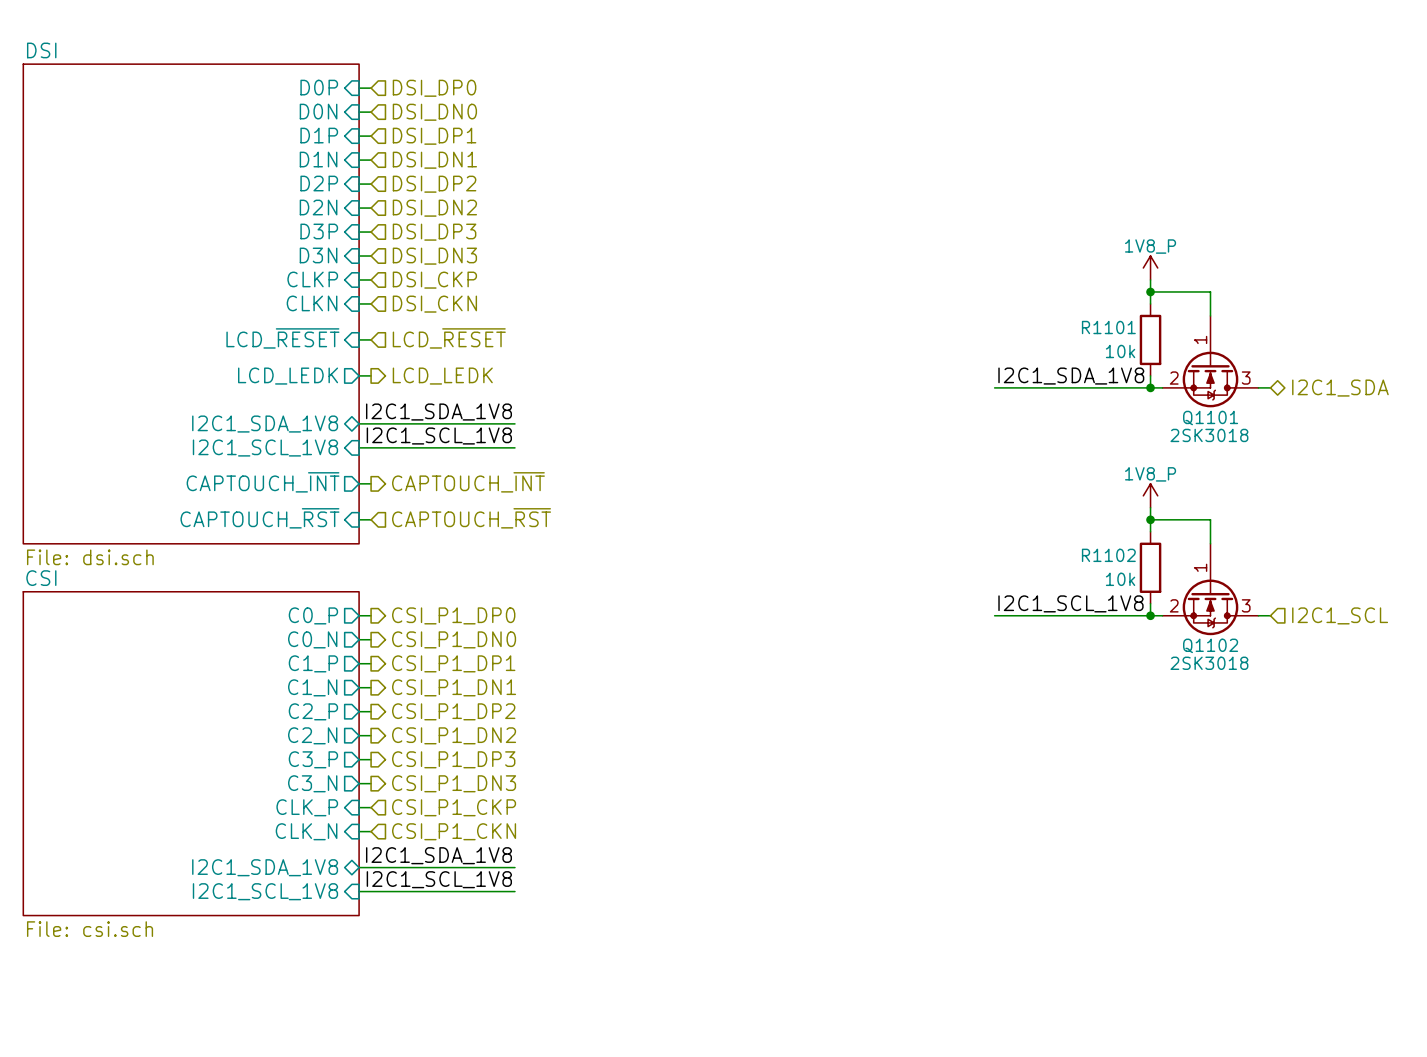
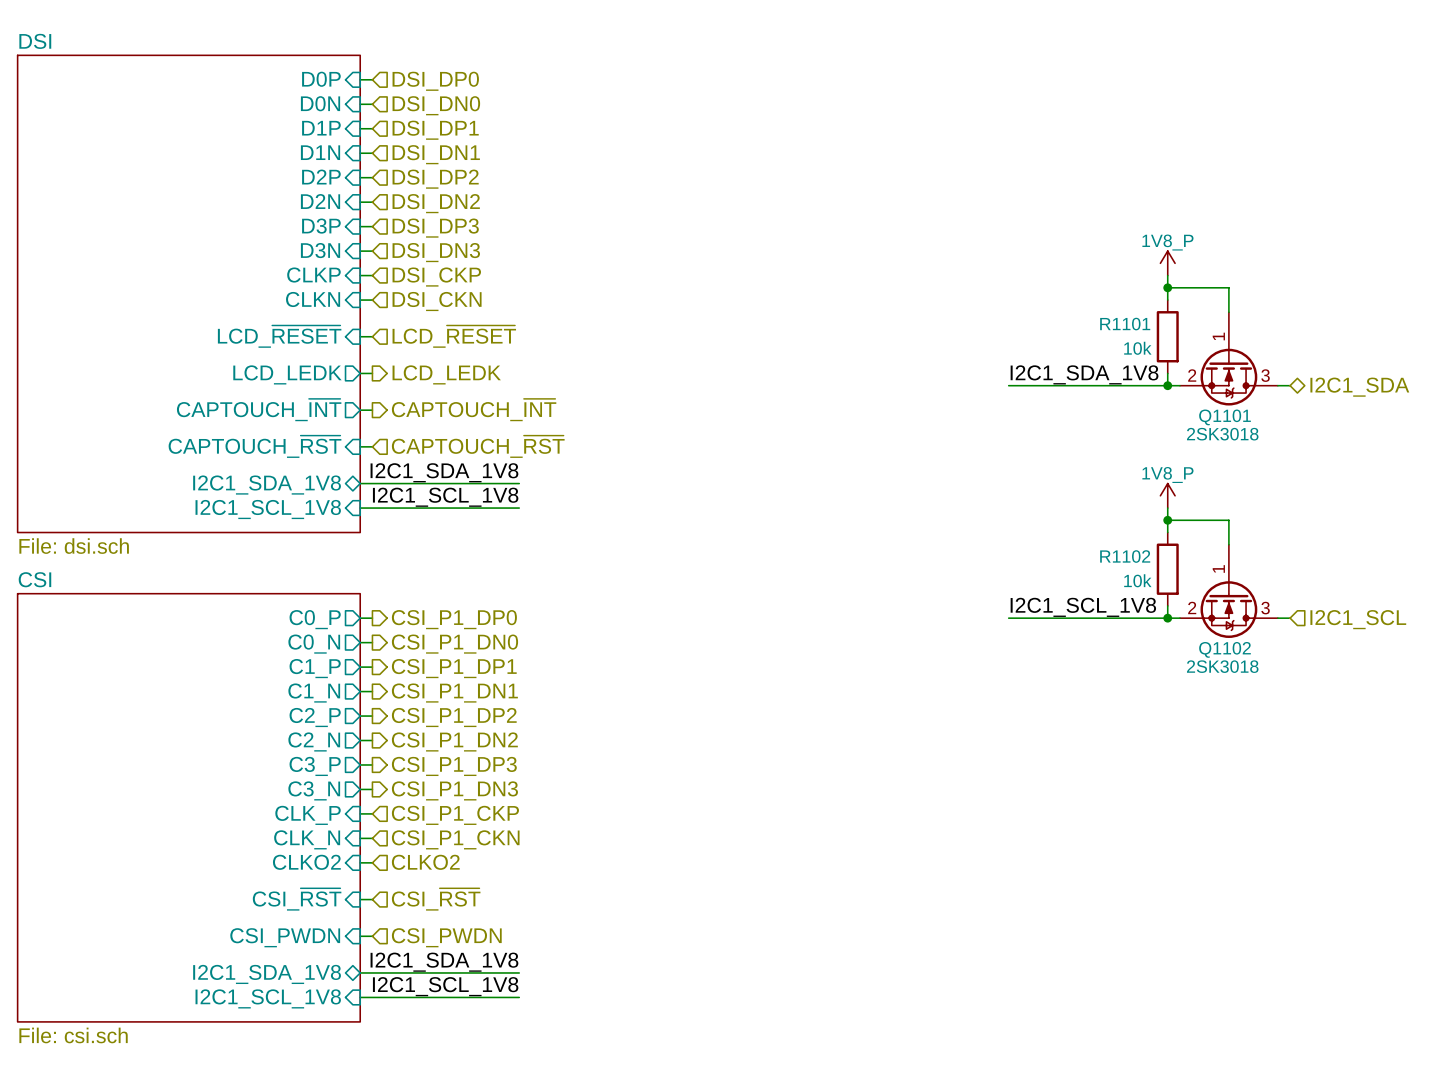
sheet DSI shape: [23, 64, 360, 544] -> [17, 55, 361, 533]
sheet pin: none -> CAPTOUCH_~{INT} (259, 410)
label position: I2C1_SDA_1V8 (438, 412) -> I2C1_SDA_1V8 (444, 472)
wire: (359, 423) (514, 423) -> (360, 508) (519, 508)
sheet pin: I2C1_SDA_1V8 (265, 424) -> none
label position: I2C1_SCL_1V8 (439, 436) -> I2C1_SCL_1V8 (445, 497)
wire: (371, 447) (514, 447) -> (372, 483) (519, 483)
sheet pin: I2C1_SCL_1V8 (265, 448) -> CAPTOUCH_~{RST} (255, 446)
sheet pin shape: output (263, 482) -> bidirectional (267, 485)
sheet pin: CAPTOUCH_~{INT} (263, 482) -> I2C1_SDA_1V8 (267, 485)
hierarchical label position: CAPTOUCH_~{INT} (468, 482) -> CAPTOUCH_~{INT} (474, 410)
sheet pin: none -> I2C1_SCL_1V8 (268, 509)
sheet pin: CAPTOUCH_~{RST} (259, 518) -> none
hierarchical label position: CAPTOUCH_~{RST} (471, 518) -> CAPTOUCH_~{RST} (478, 446)
wire: (359, 519) (371, 519) -> (360, 410) (372, 410)
sheet CSI: File: csi.sch (191, 753) -> none
sheet CSI: none -> File: csi.sch (188, 807)
sheet pin: none -> CLKO2 (306, 862)
wire: none -> (360, 862) (372, 862)
hierarchical label: none -> CLKO2 (425, 862)
label position: I2C1_SDA_1V8 (438, 855) -> I2C1_SDA_1V8 (444, 962)
sheet pin position: I2C1_SDA_1V8 (265, 867) -> I2C1_SDA_1V8 (267, 974)
wire: (359, 867) (514, 867) -> (360, 972) (519, 972)
label position: I2C1_SCL_1V8 (439, 879) -> I2C1_SCL_1V8 (445, 986)
hierarchical label: none -> CSI_~{RST} (436, 899)
sheet pin: I2C1_SCL_1V8 (265, 891) -> CSI_~{RST} (297, 899)
wire: (371, 891) (514, 891) -> none
sheet pin: none -> CSI_PWDN (285, 937)
wire: none -> (360, 936) (372, 936)
hierarchical label: none -> CSI_PWDN (446, 937)
sheet pin: none -> I2C1_SCL_1V8 (268, 998)
wire: none -> (360, 997) (519, 997)

